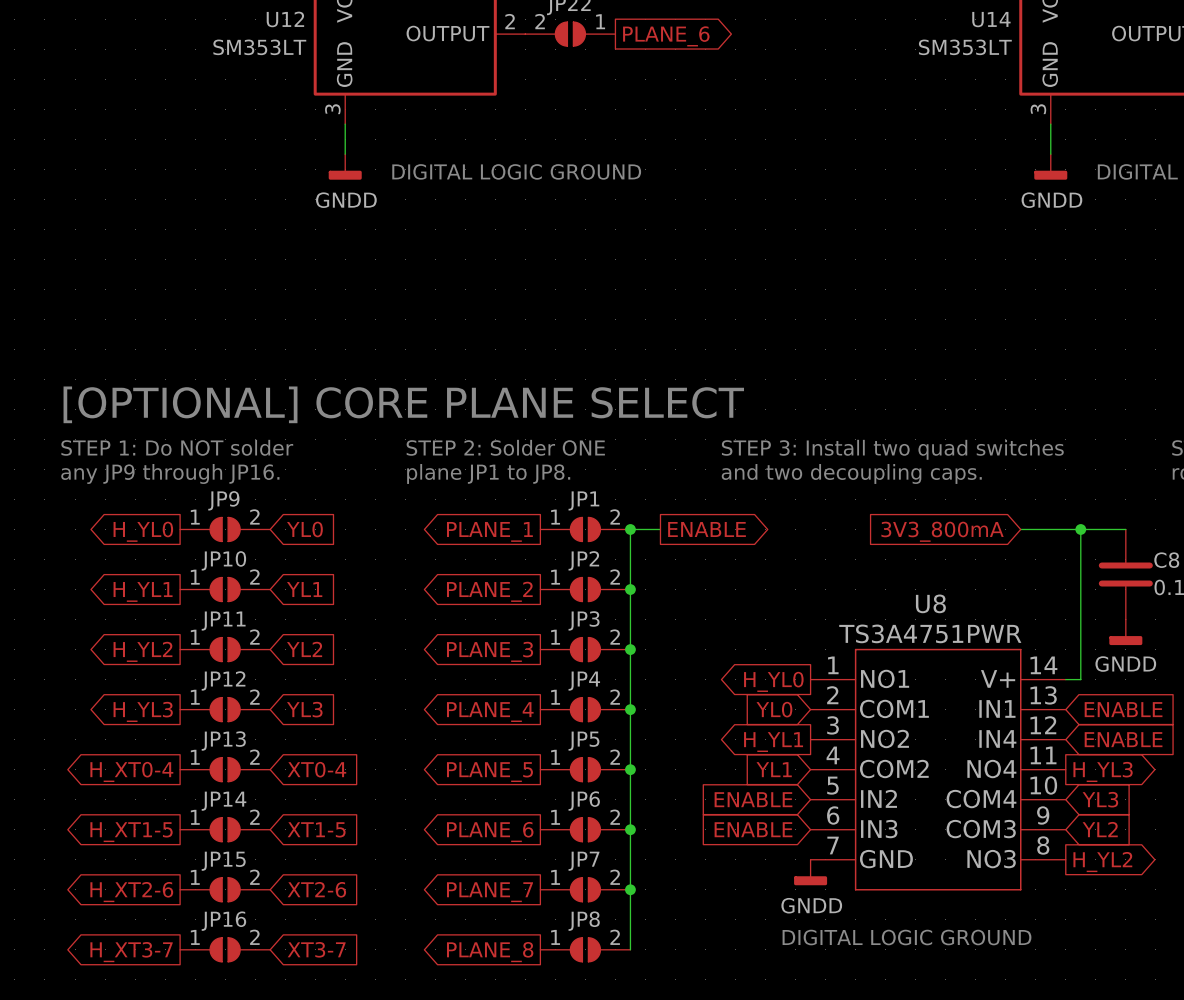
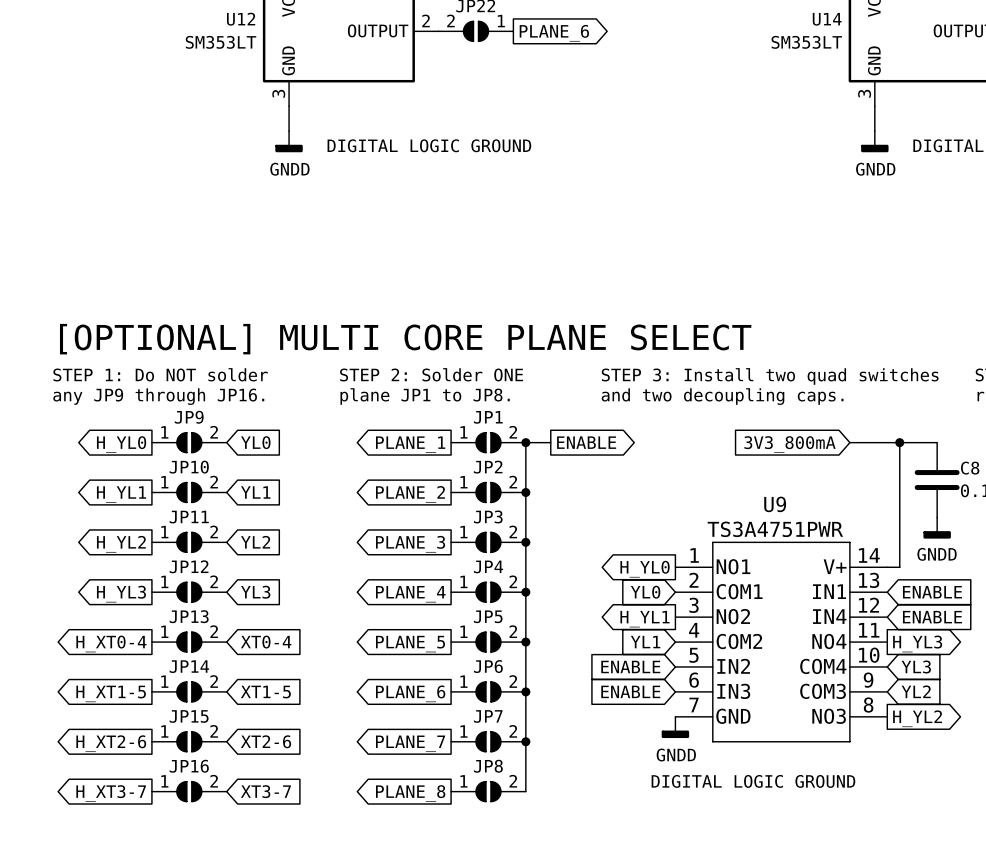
text: [OPTIONAL] CORE PLANE SELECT (403, 404) -> [OPTIONAL] MULTI CORE PLANE SELECT (405, 339)
U8 name: U8 (930, 603) -> U9 (775, 504)

